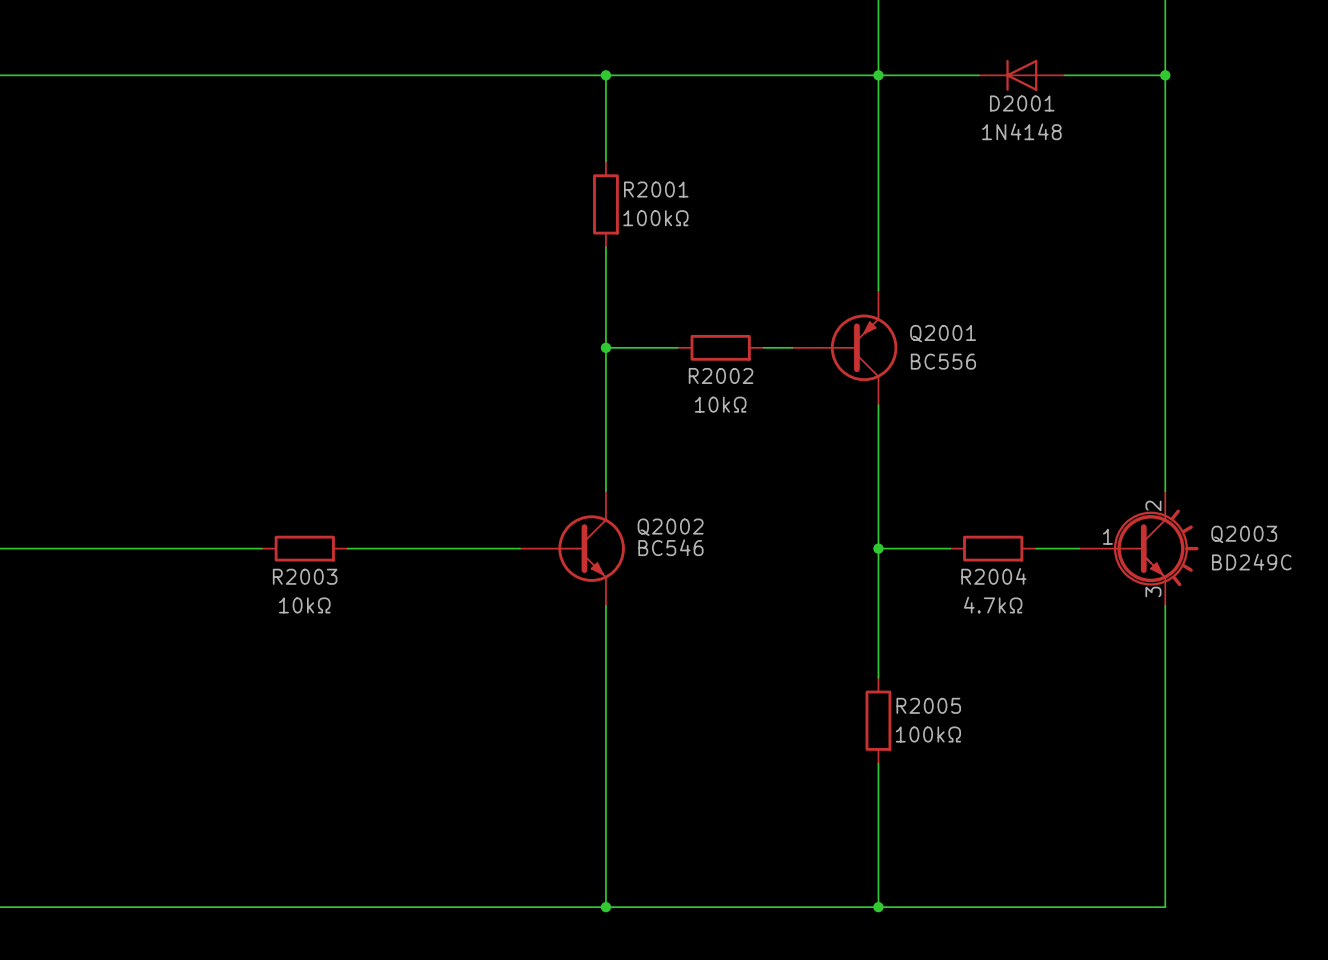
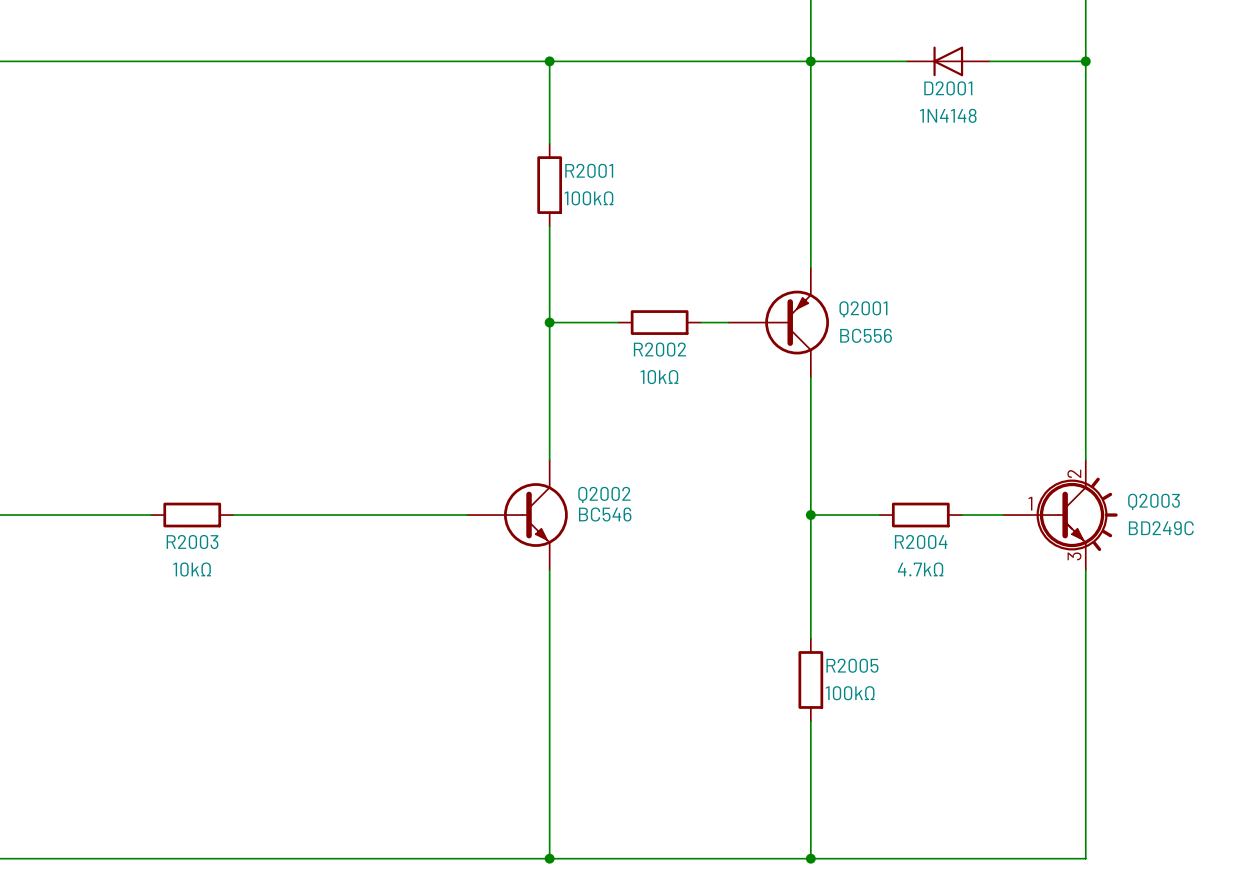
wire: (190, 548) (261, 548) -> (233, 515) (302, 515)
R2003 position: (304, 548) -> (192, 515)

